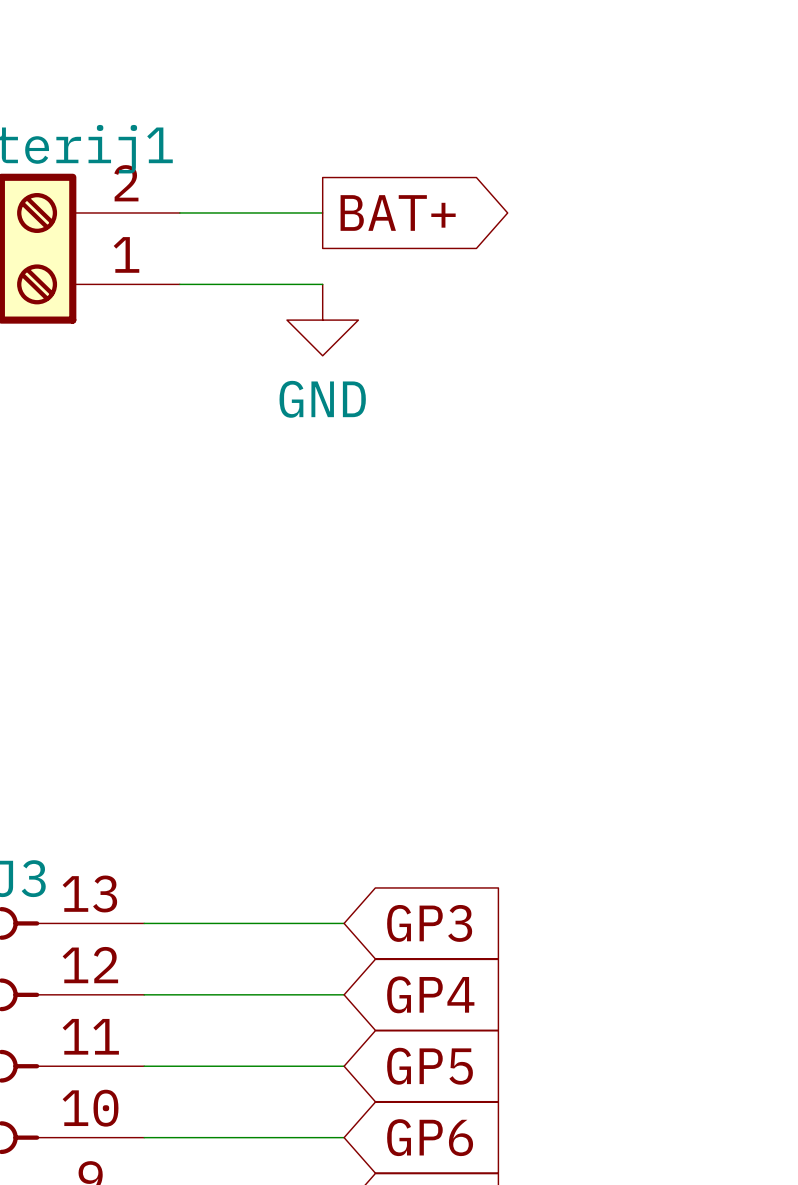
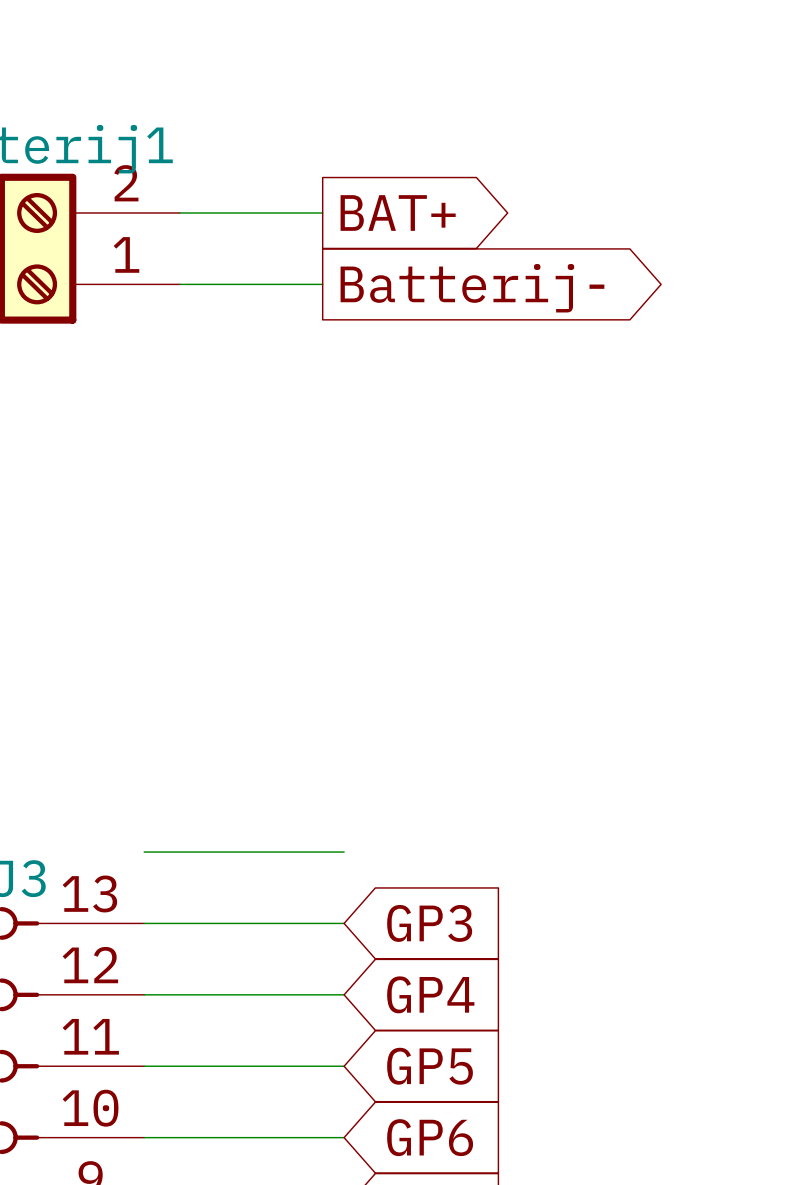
global label: none -> Batterij- (472, 288)
power symbol: GND (322, 320) -> none
wire: none -> (144, 852) (344, 852)

